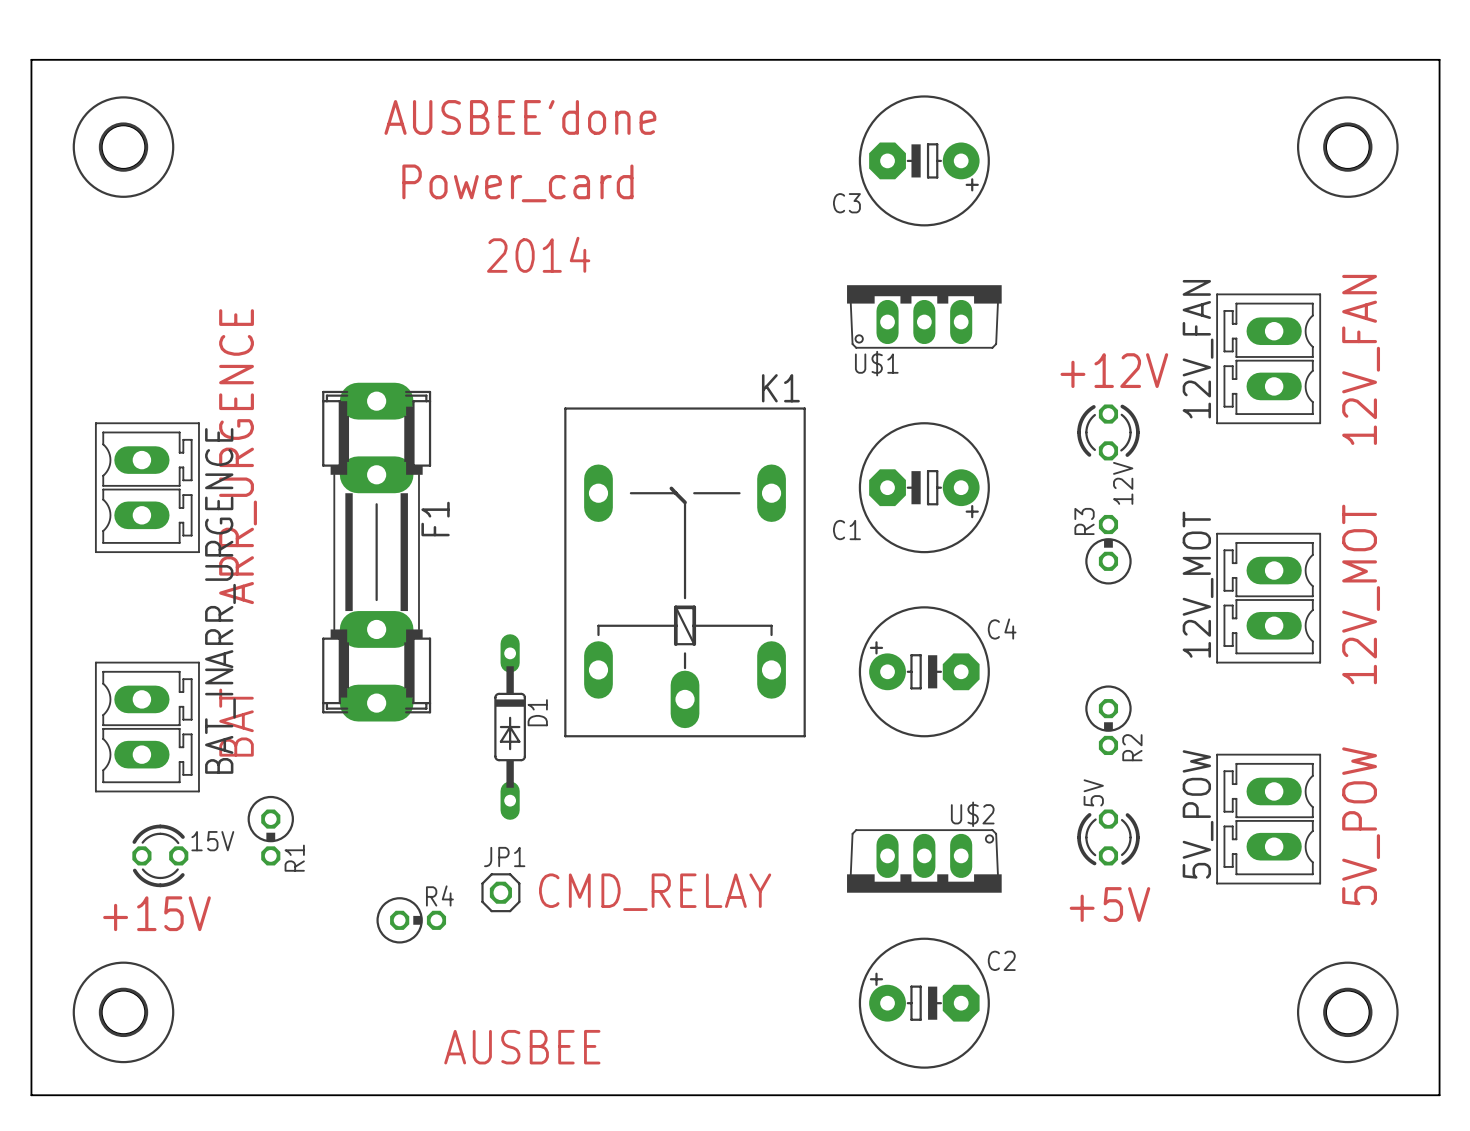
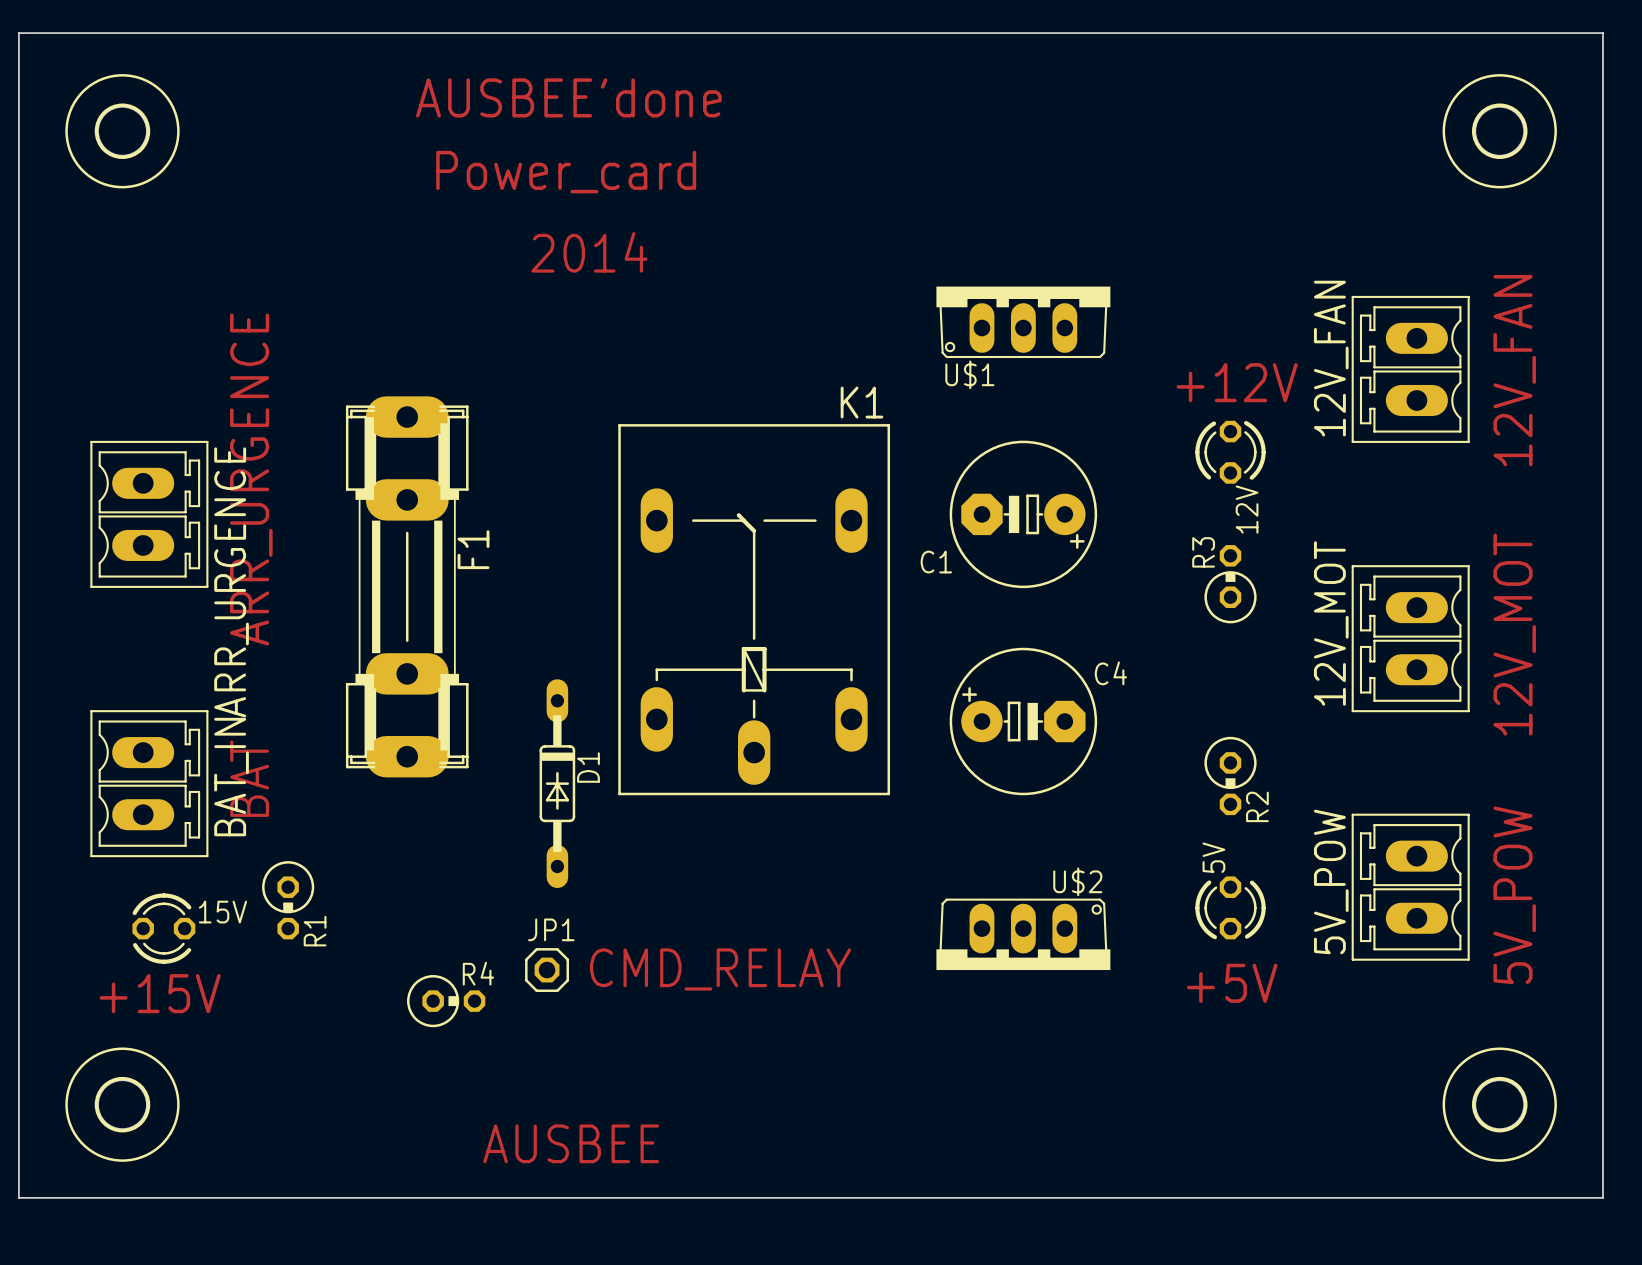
C3: (924, 160) -> none
C2: (924, 1003) -> none

